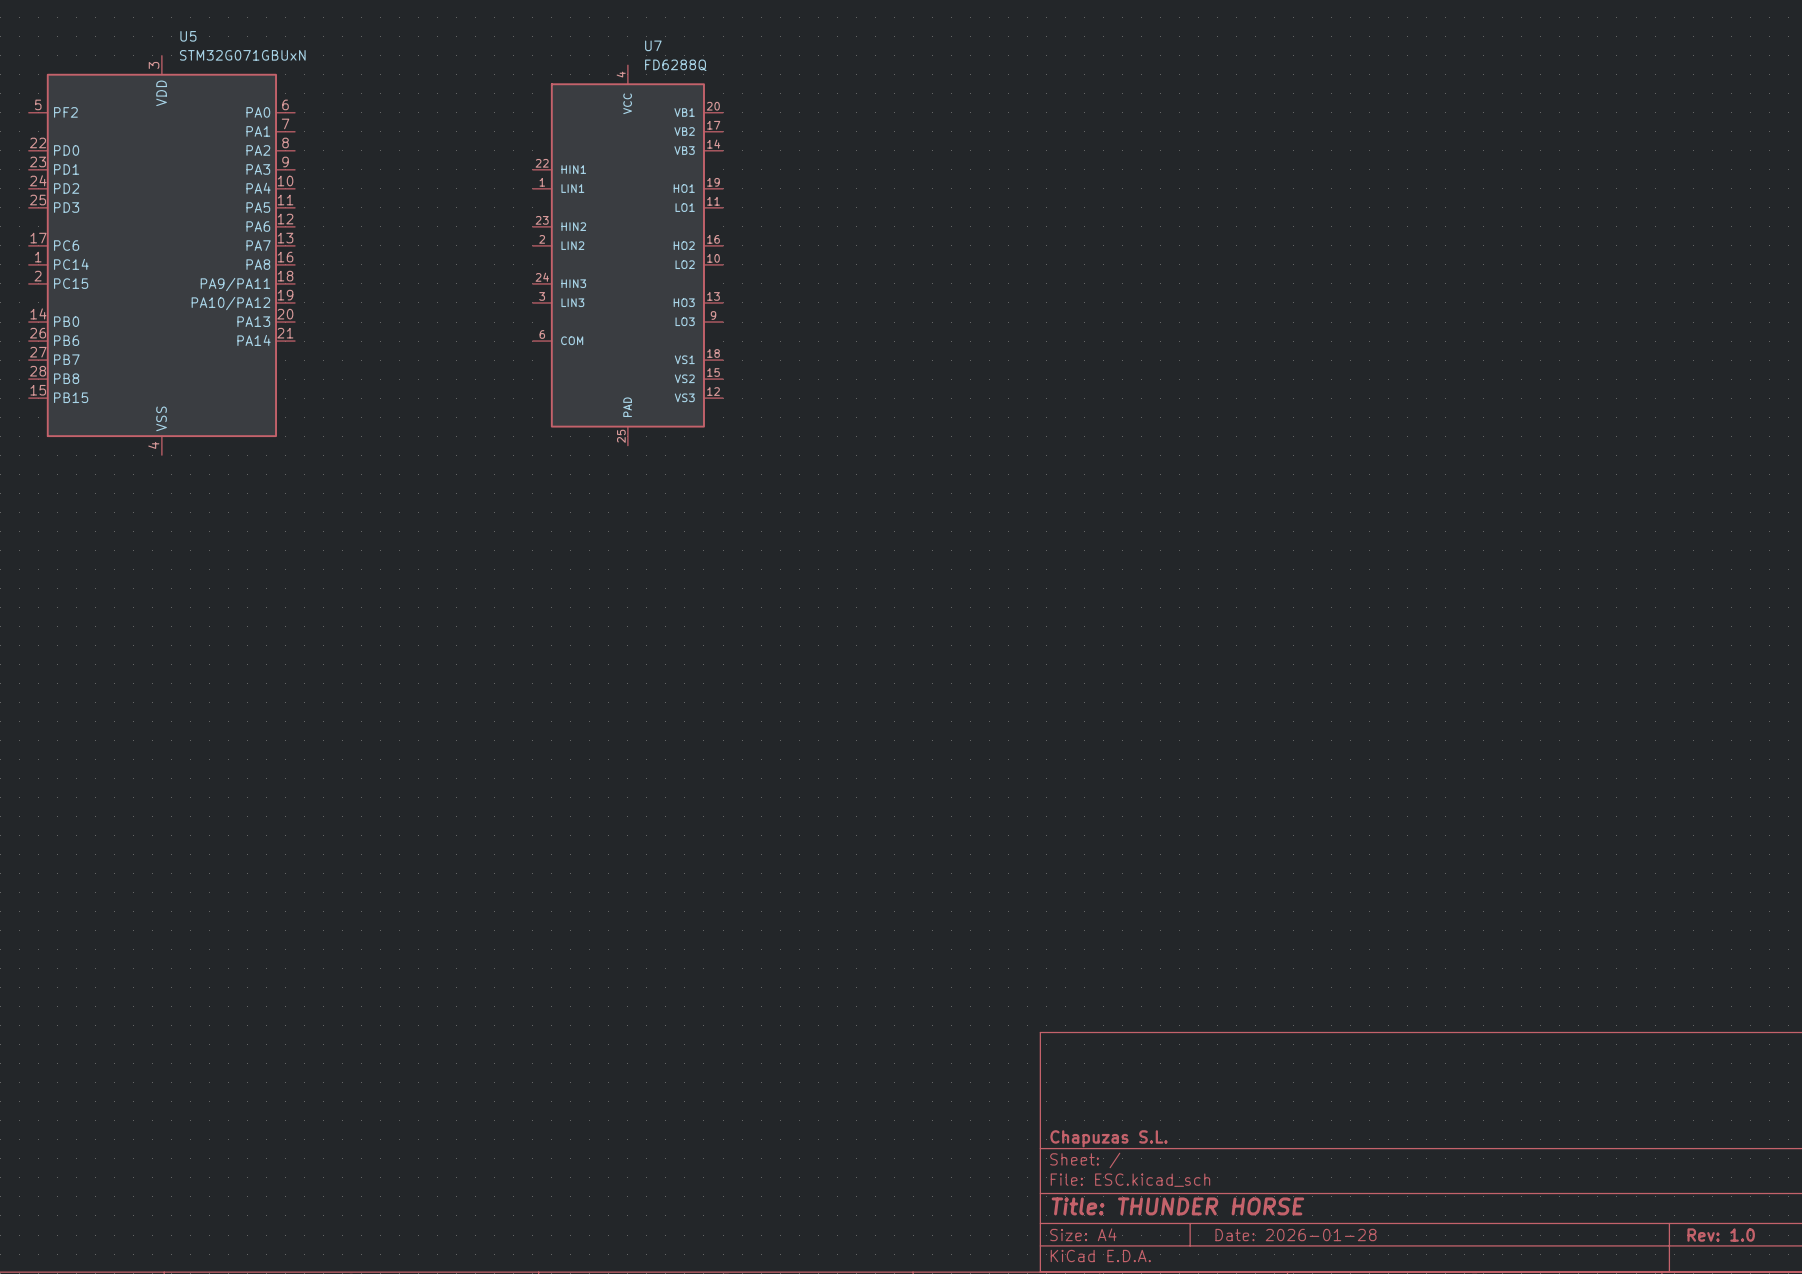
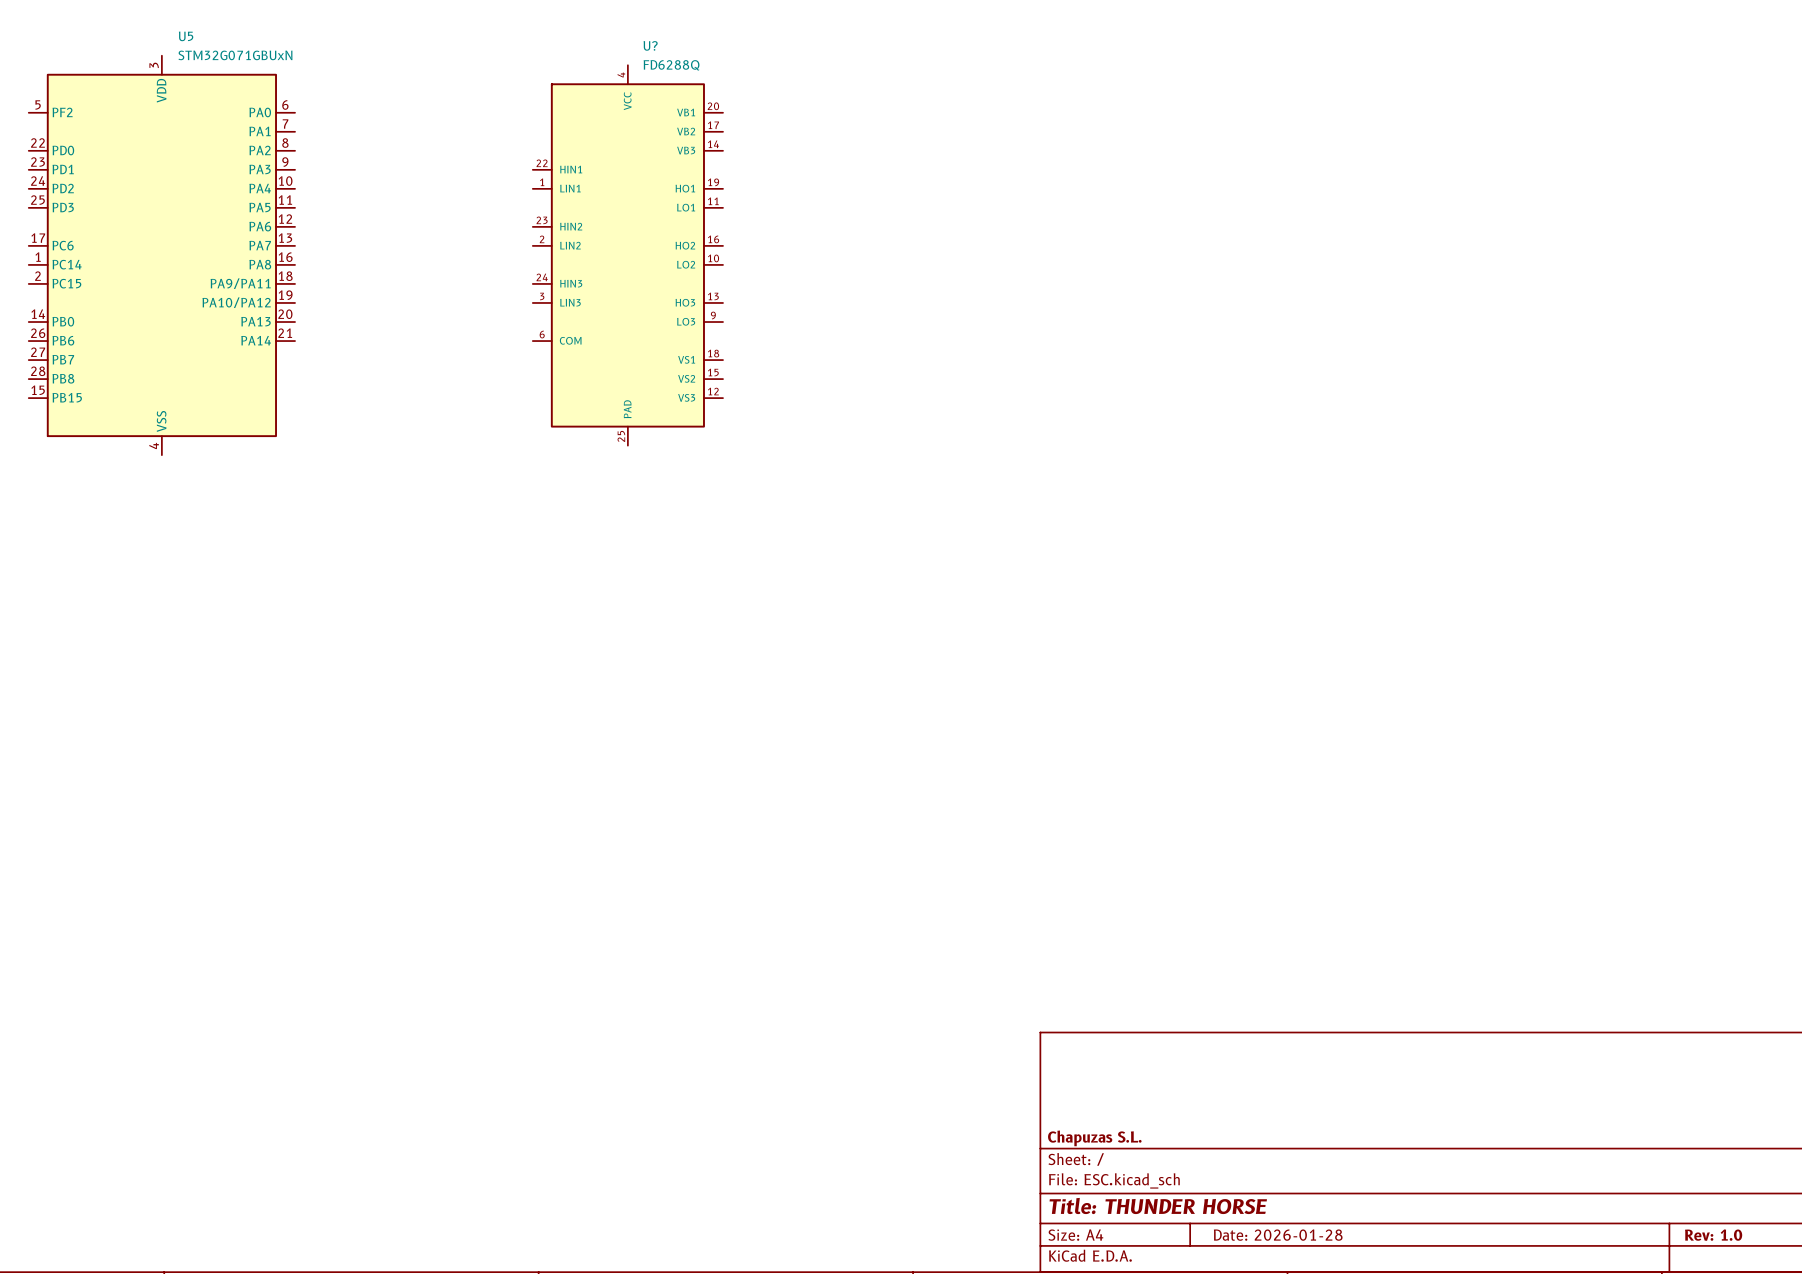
U7 name: U7 (653, 45) -> U? (650, 45)

